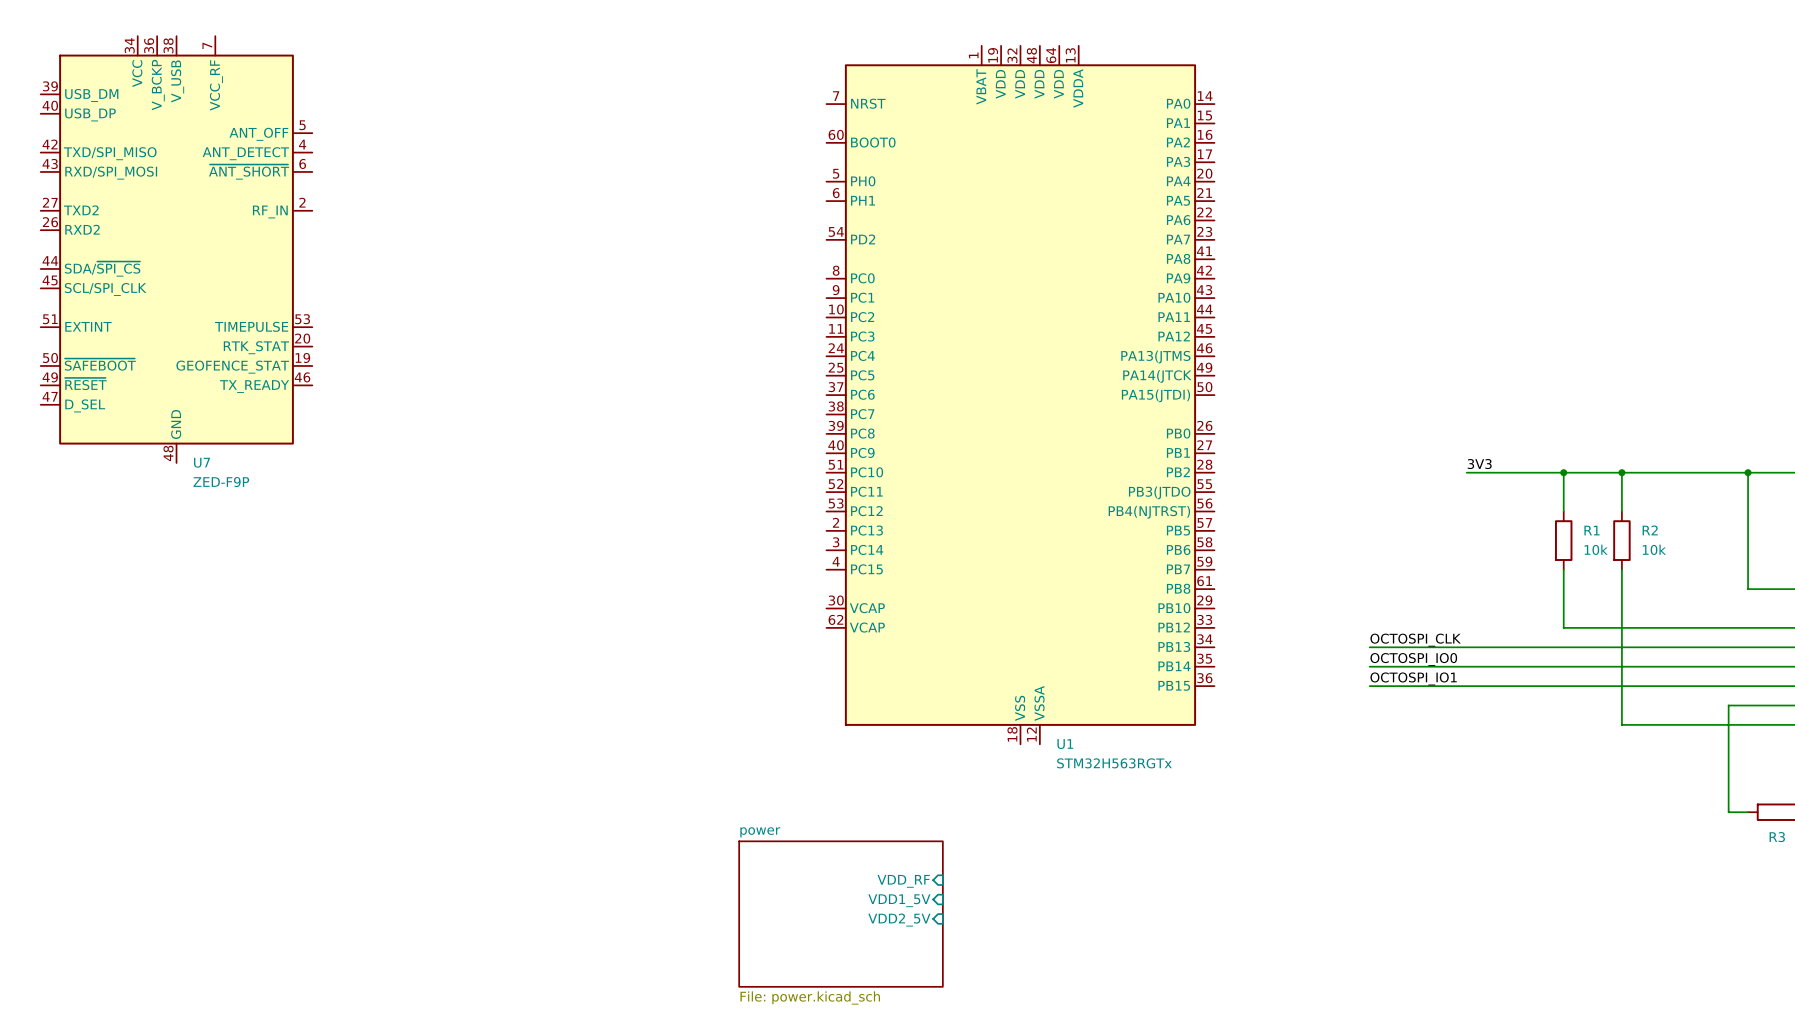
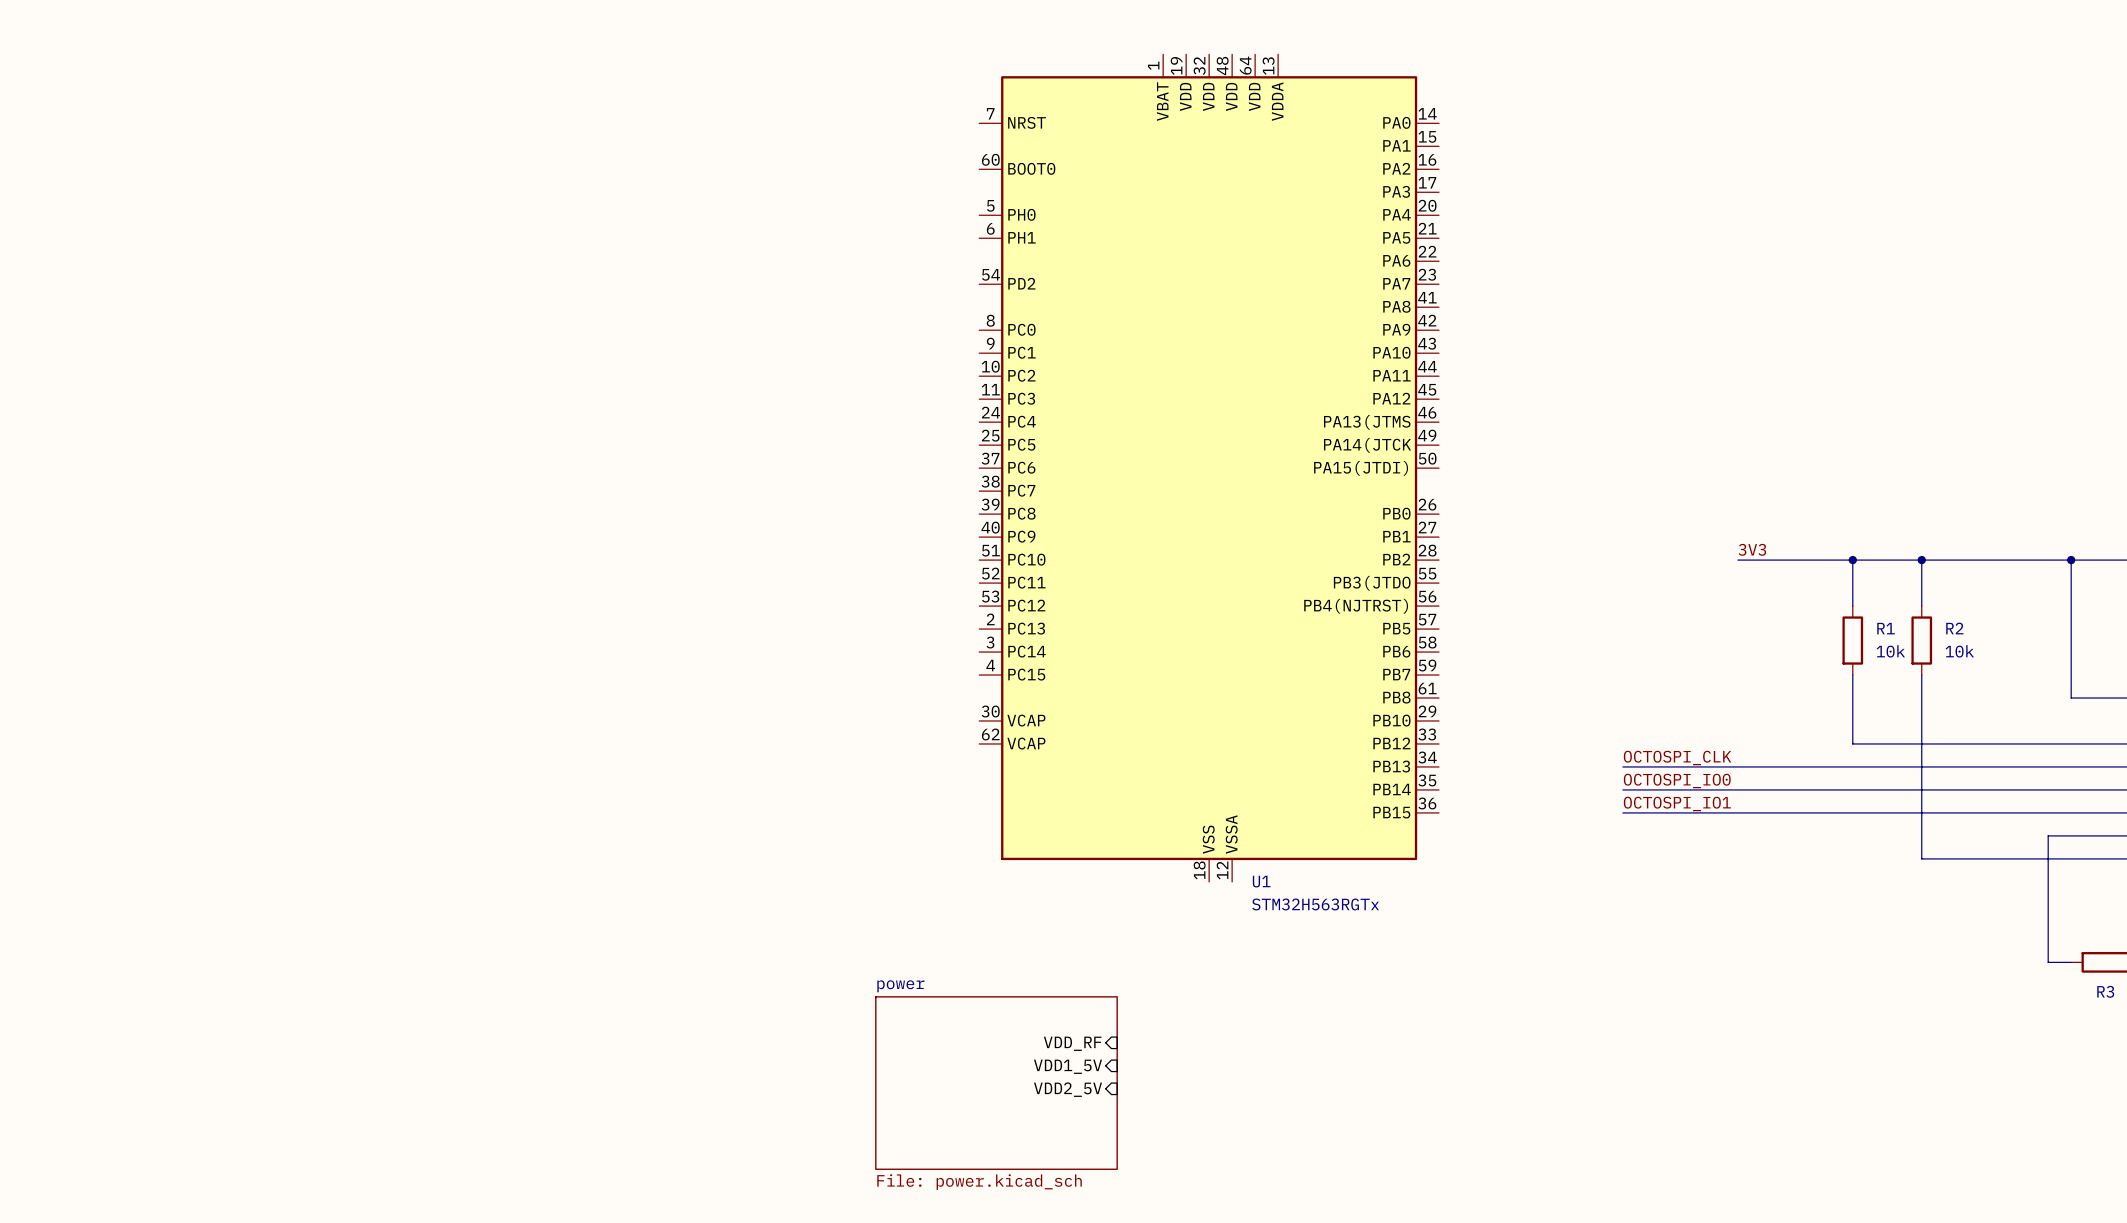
U7: ZED-F9P (176, 249) -> none

